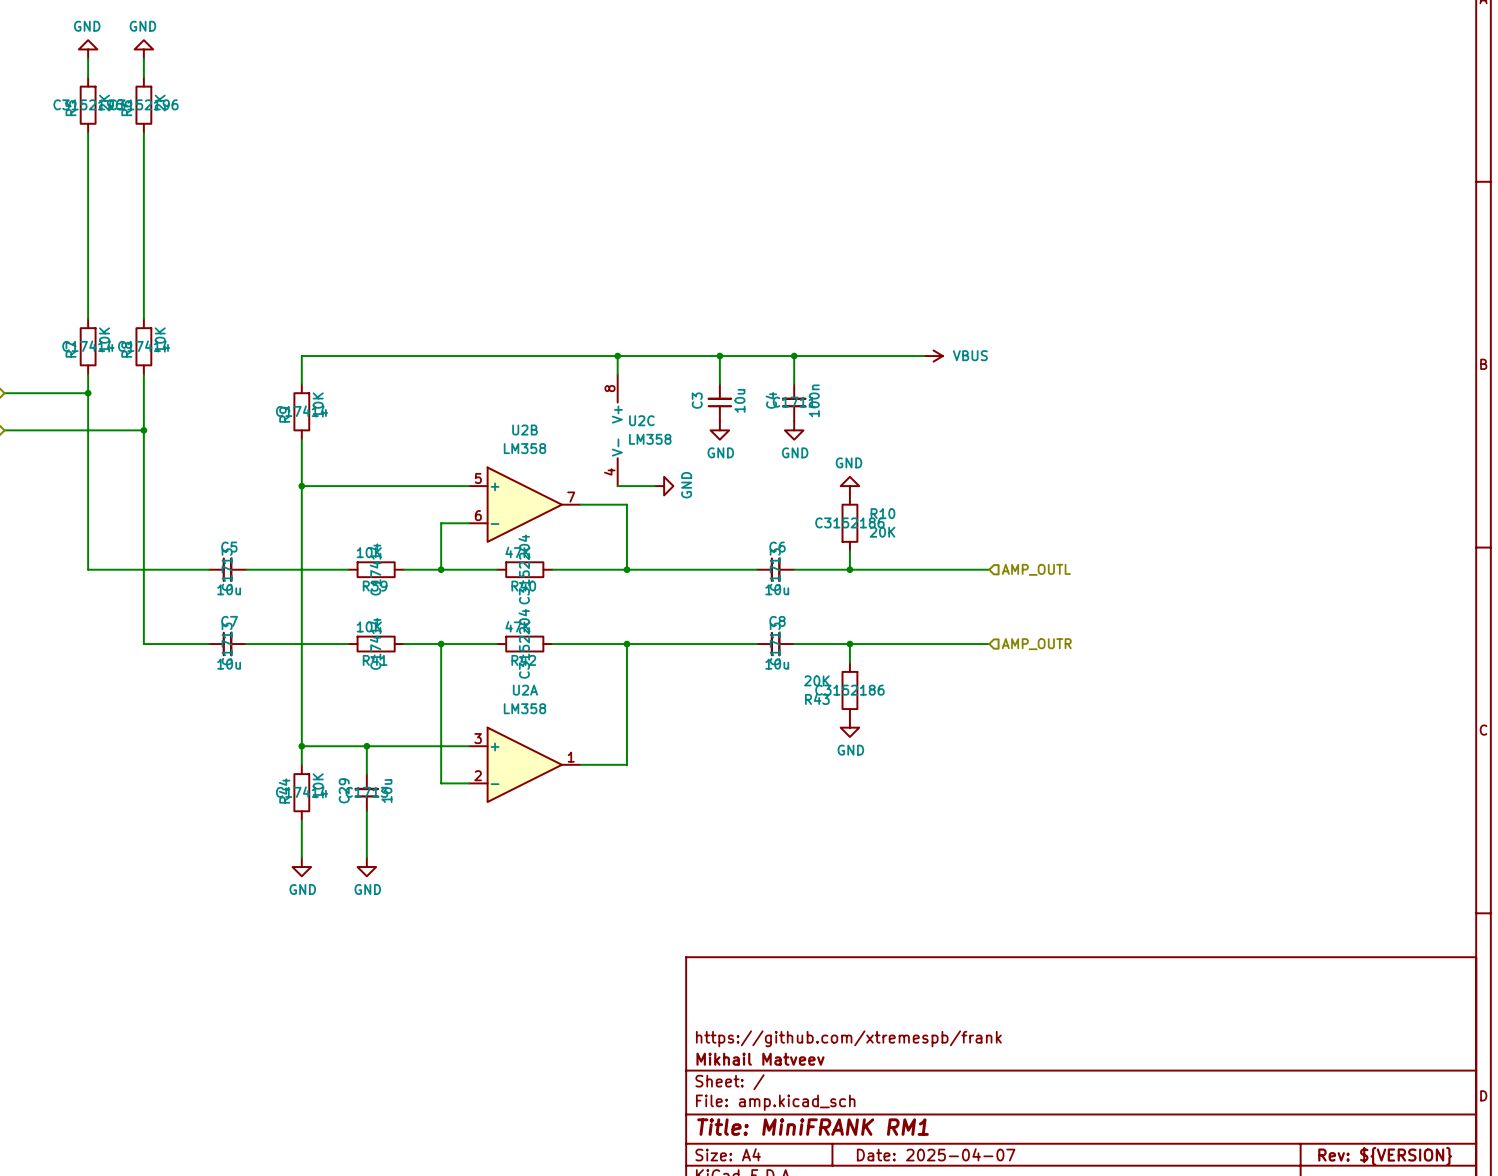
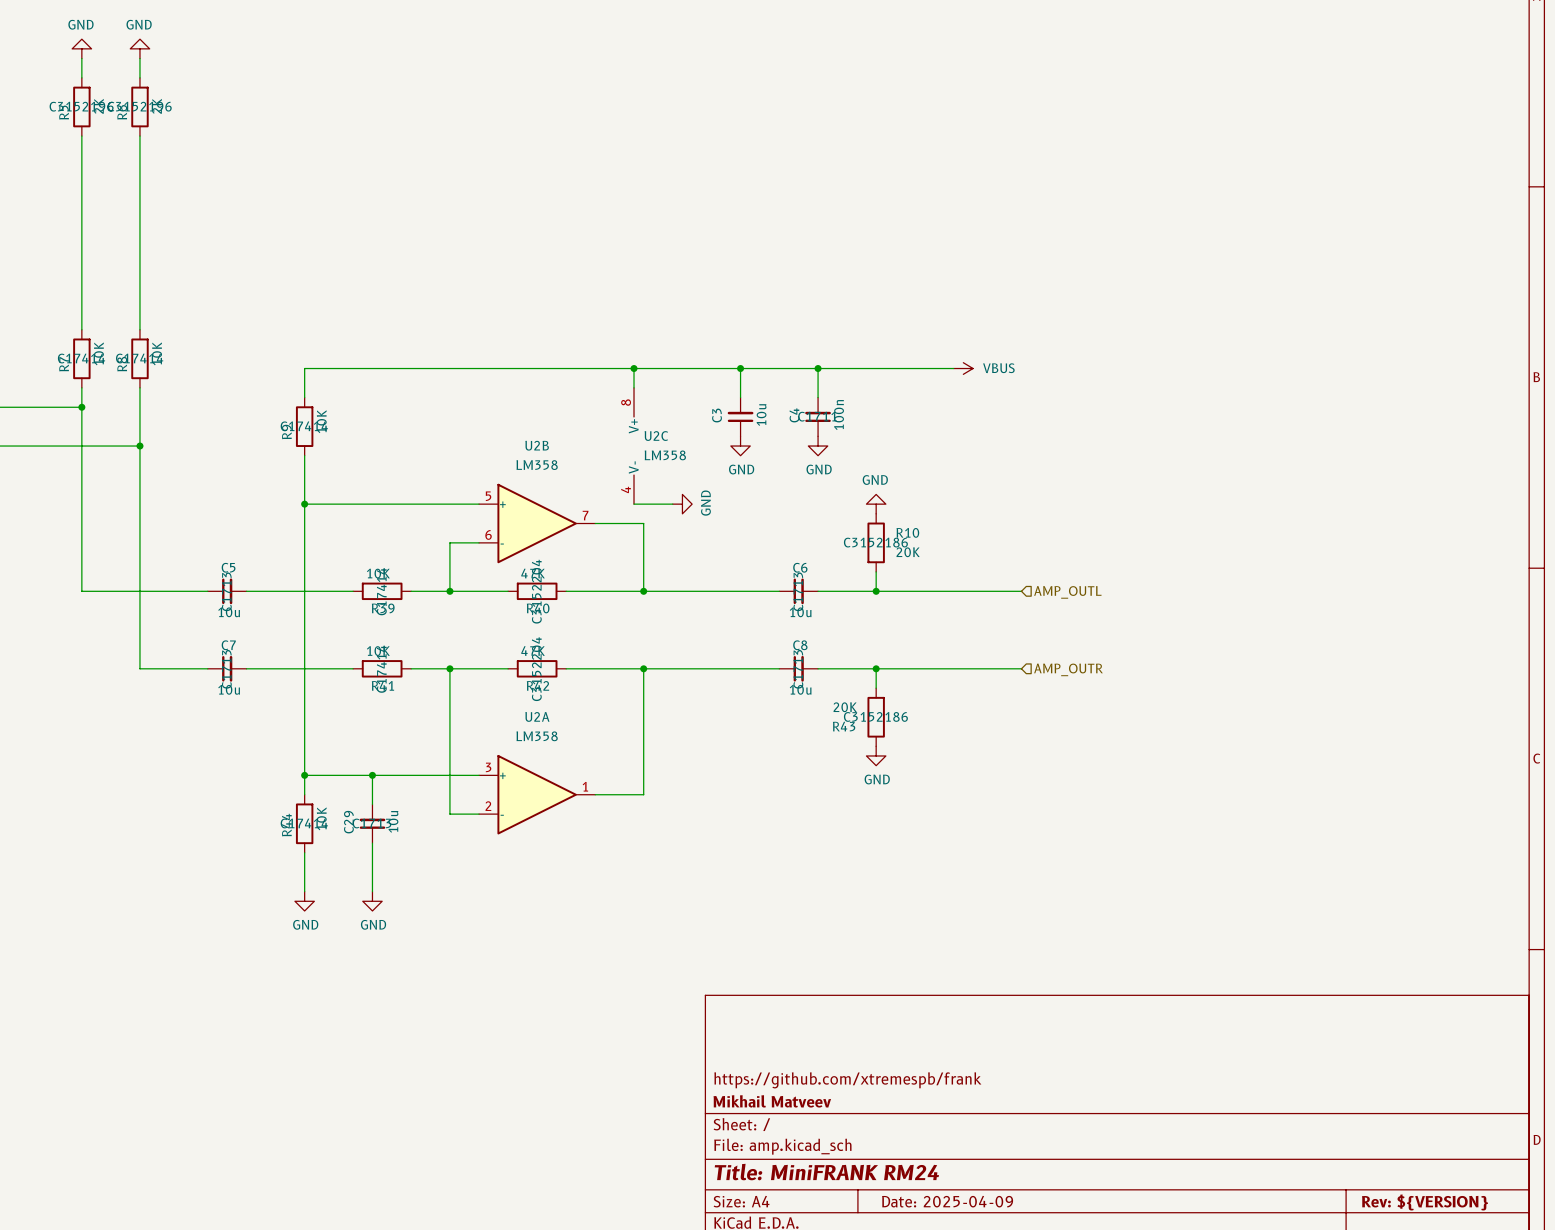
title block: Title: MiniFRANK RM1 (813, 1127) -> Title: MiniFRANK RM24 (826, 1172)
title block: Date: 2025-04-07 (936, 1154) -> Date: 2025-04-09 (947, 1201)

